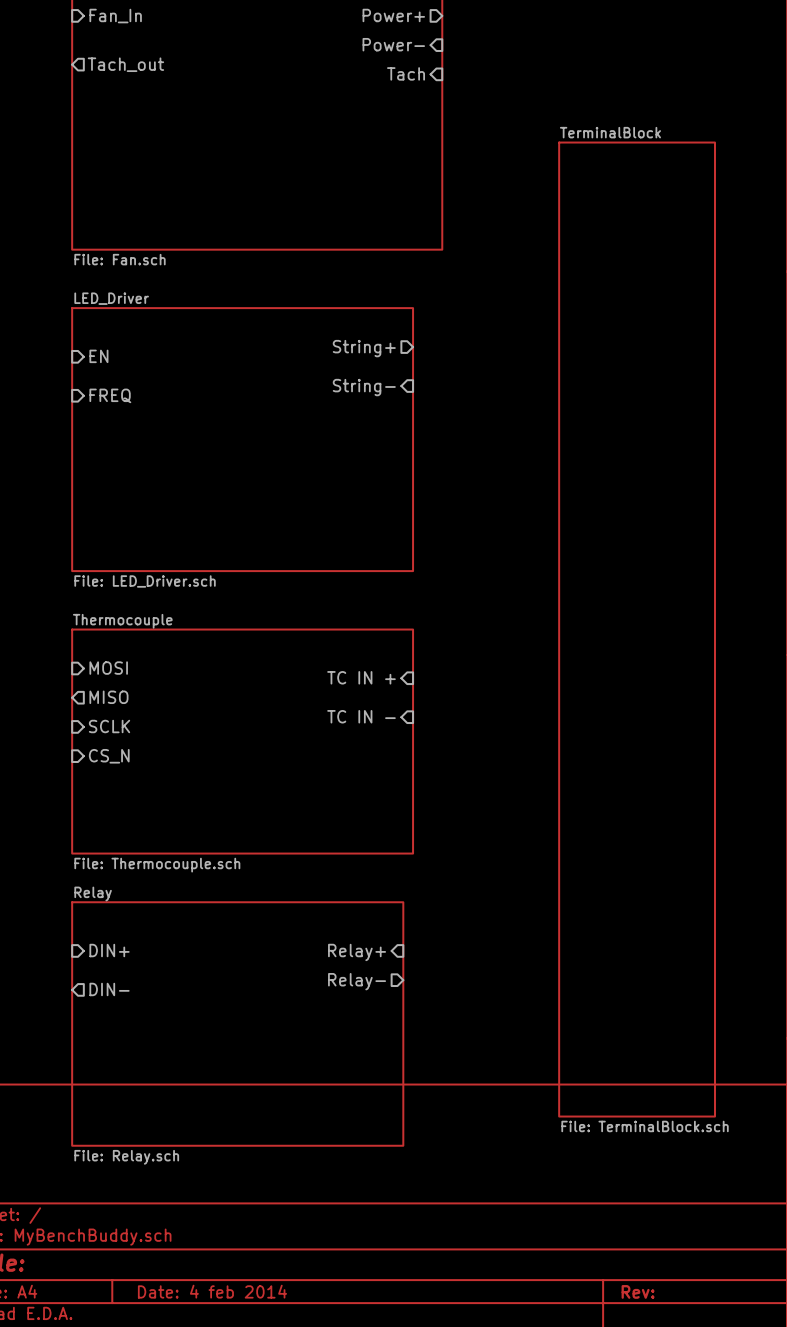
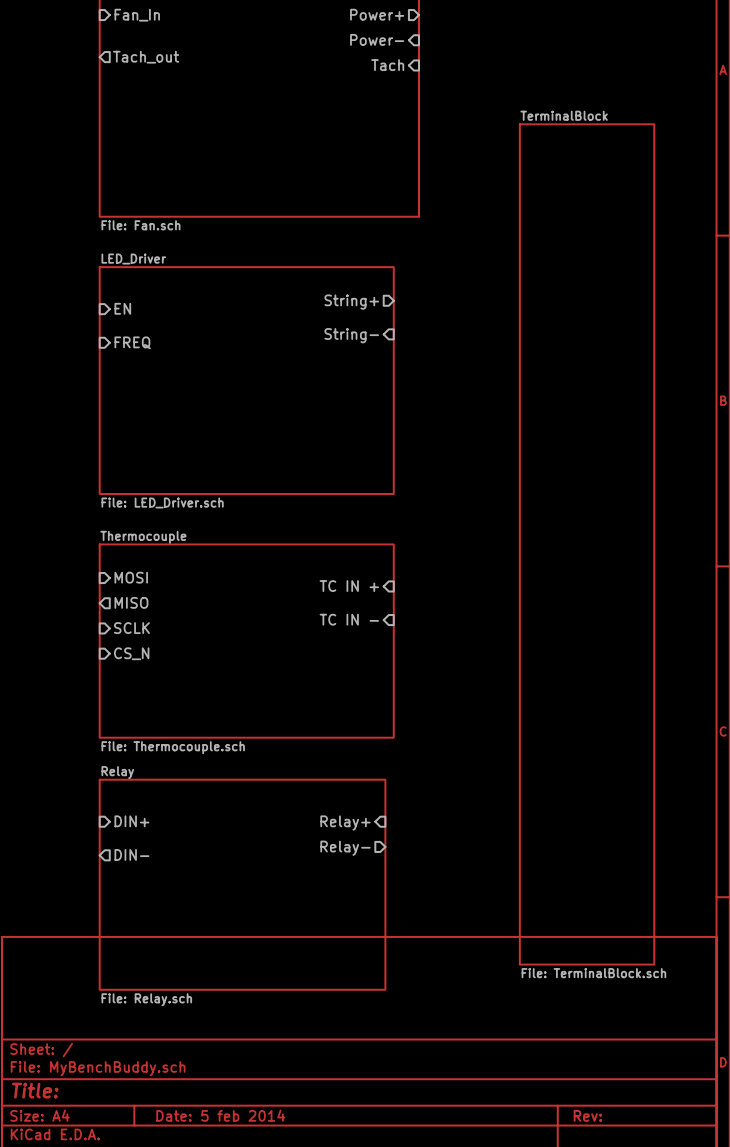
title block: Date: 4 feb 2014 (212, 1291) -> Date: 5 feb 2014 (220, 1115)

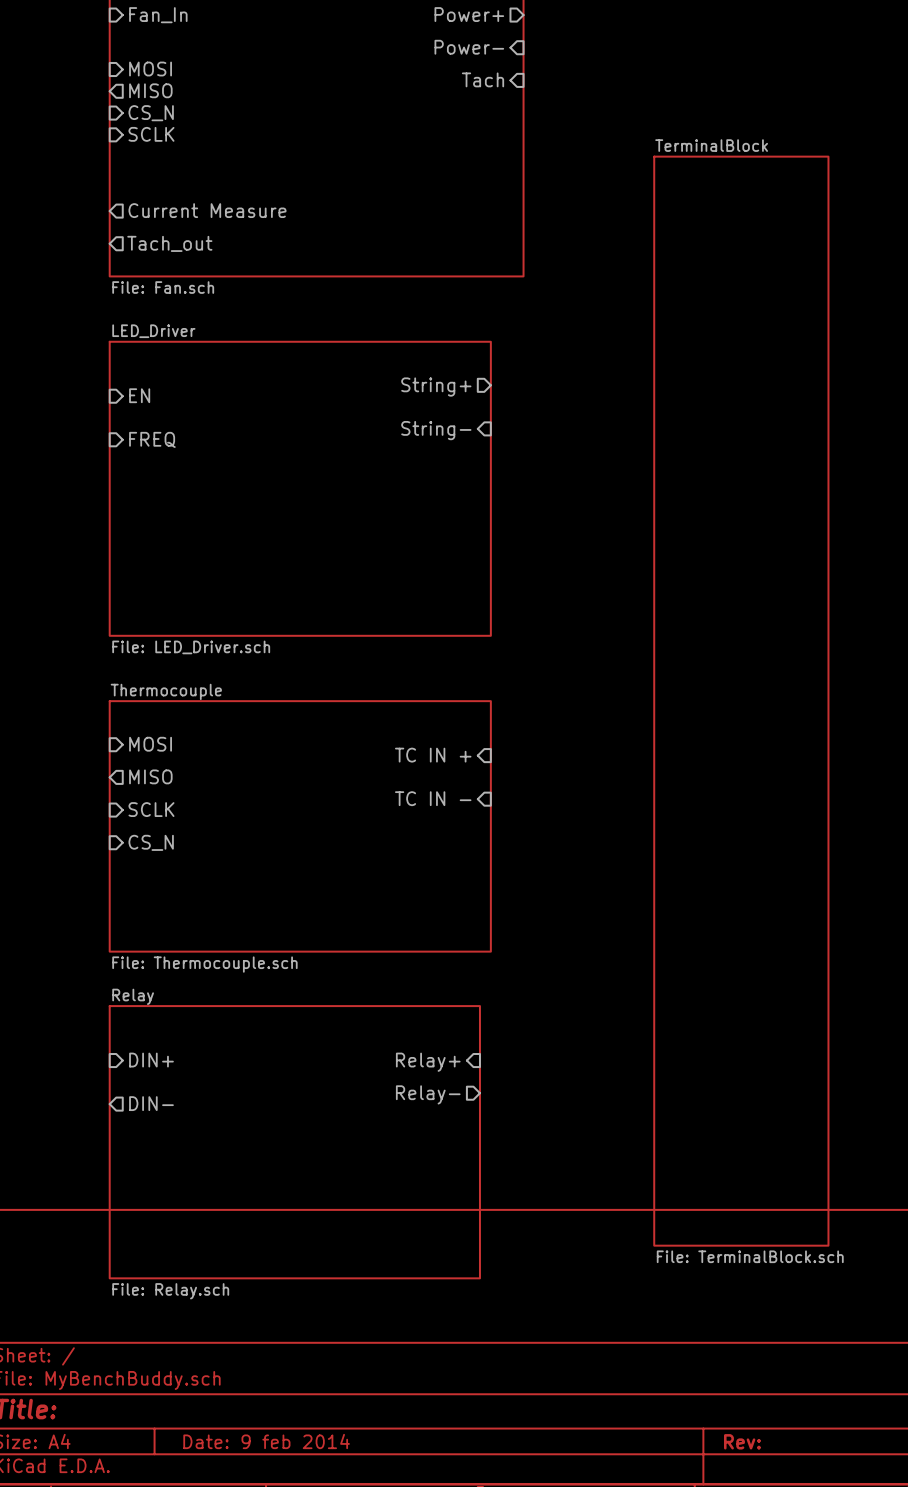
sheet pin shape: output (146, 57) -> input (150, 69)
sheet pin: Tach_out (146, 57) -> MOSI (150, 69)
sheet pin: none -> MISO (150, 90)
sheet pin: none -> CS_N (151, 113)
sheet pin: none -> SCLK (151, 134)
sheet pin: none -> Current Measure (207, 210)
sheet pin: none -> Tach_out (169, 243)
title block: Date: 5 feb 2014 (220, 1115) -> Date: 9 feb 2014 (266, 1441)

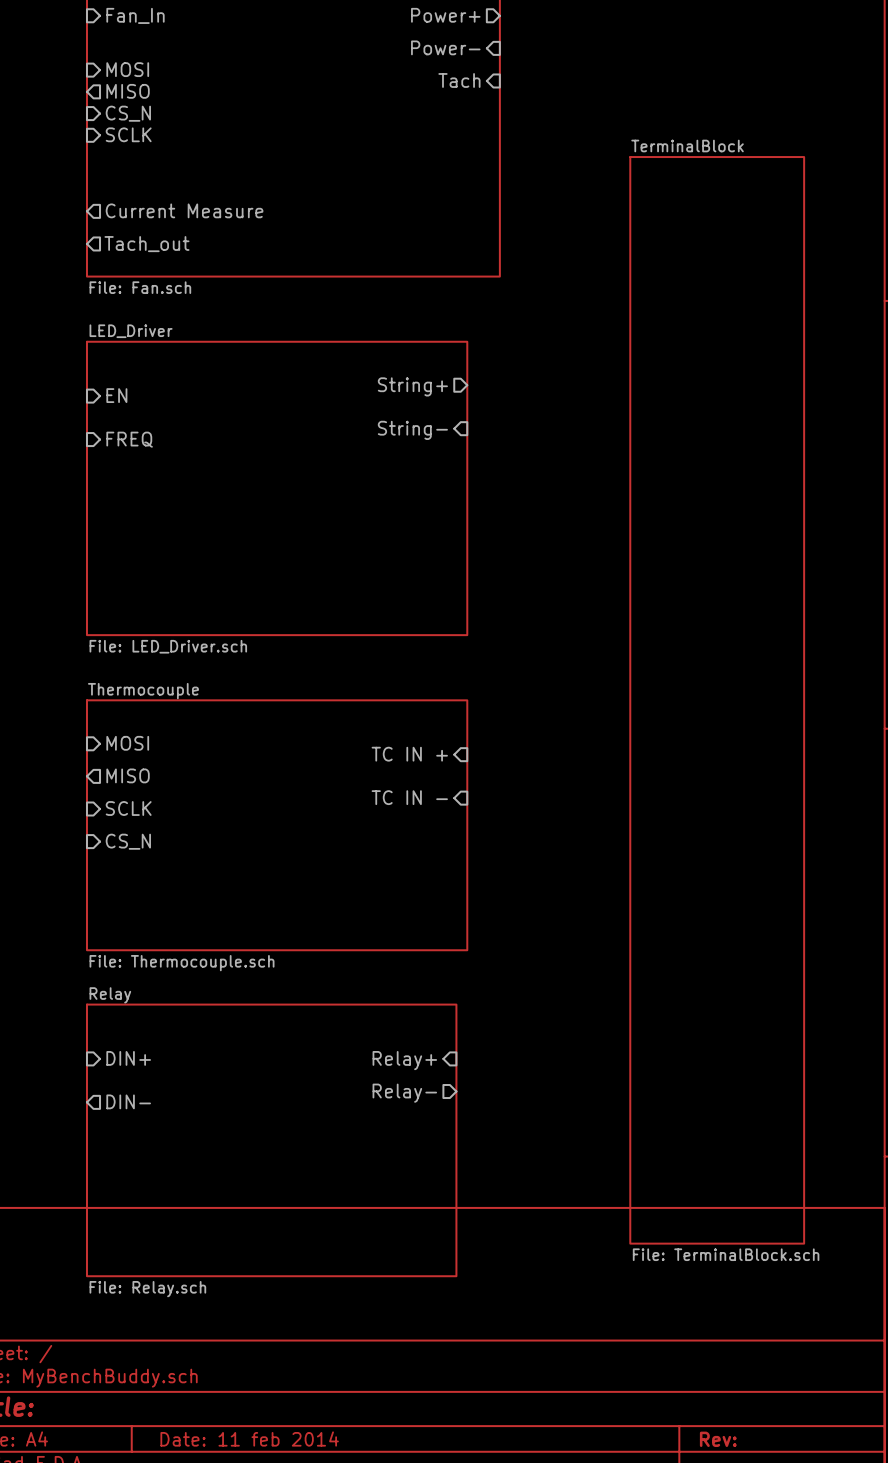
title block: Date: 9 feb 2014 (266, 1441) -> Date: 11 feb 2014 (249, 1439)

